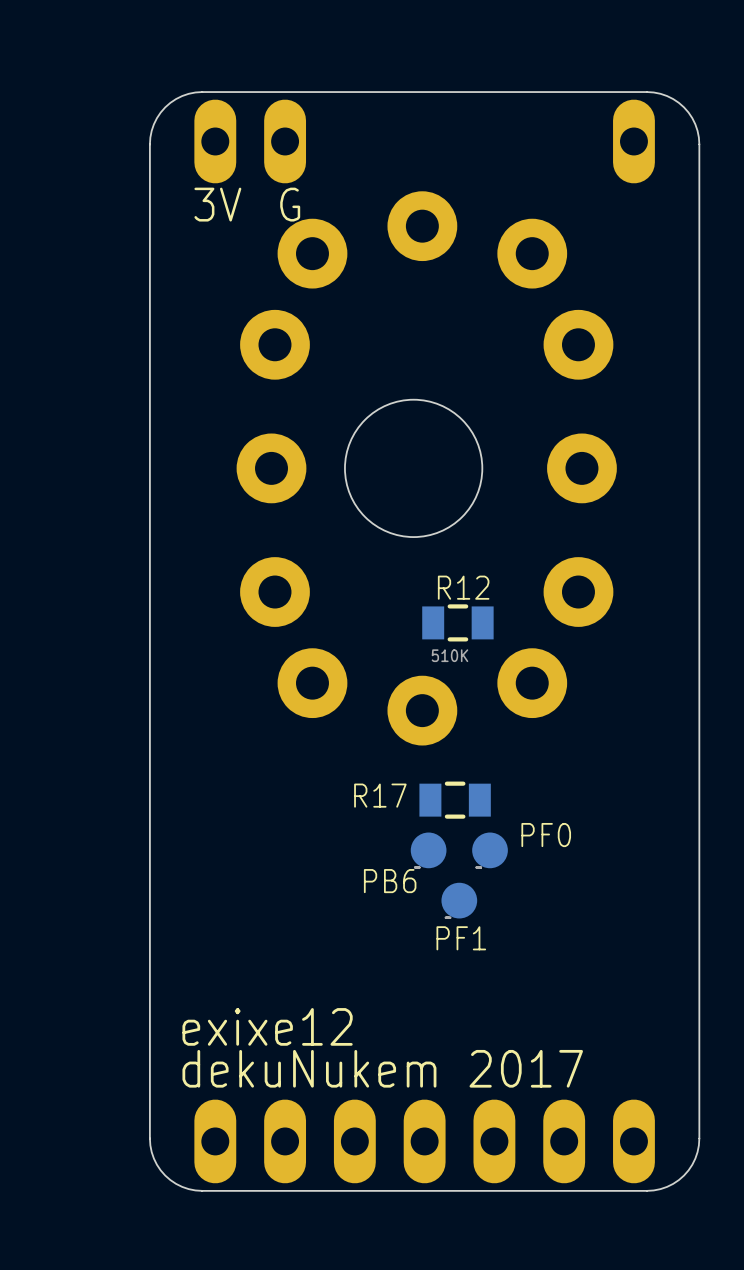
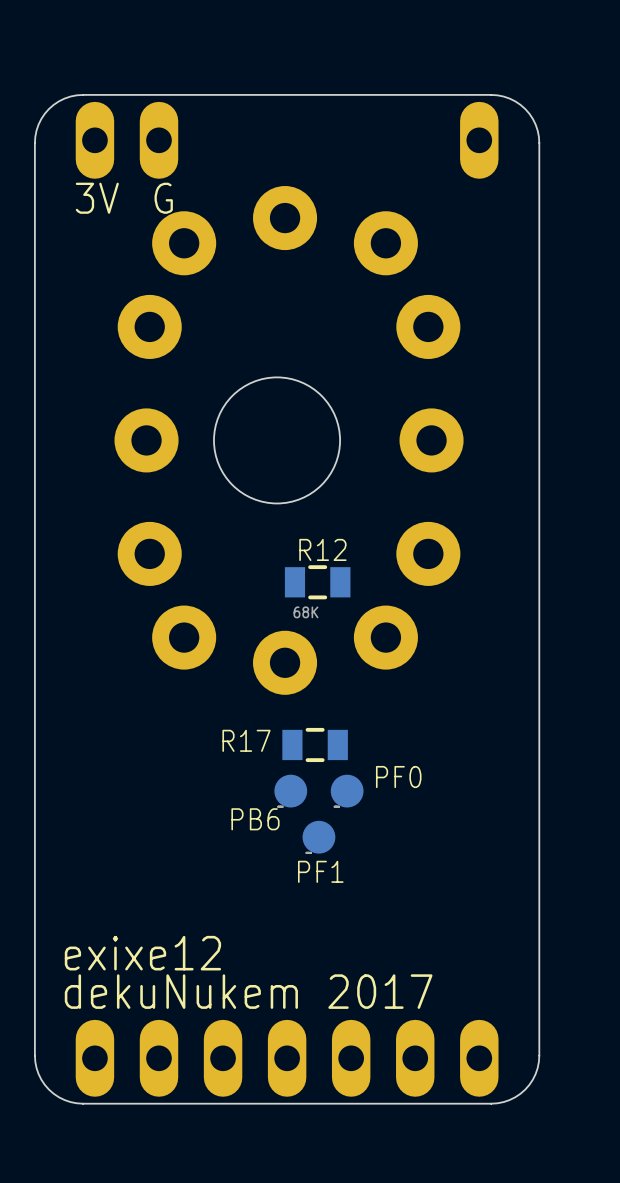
R12 value: 510K (449, 655) -> 68K (305, 612)

